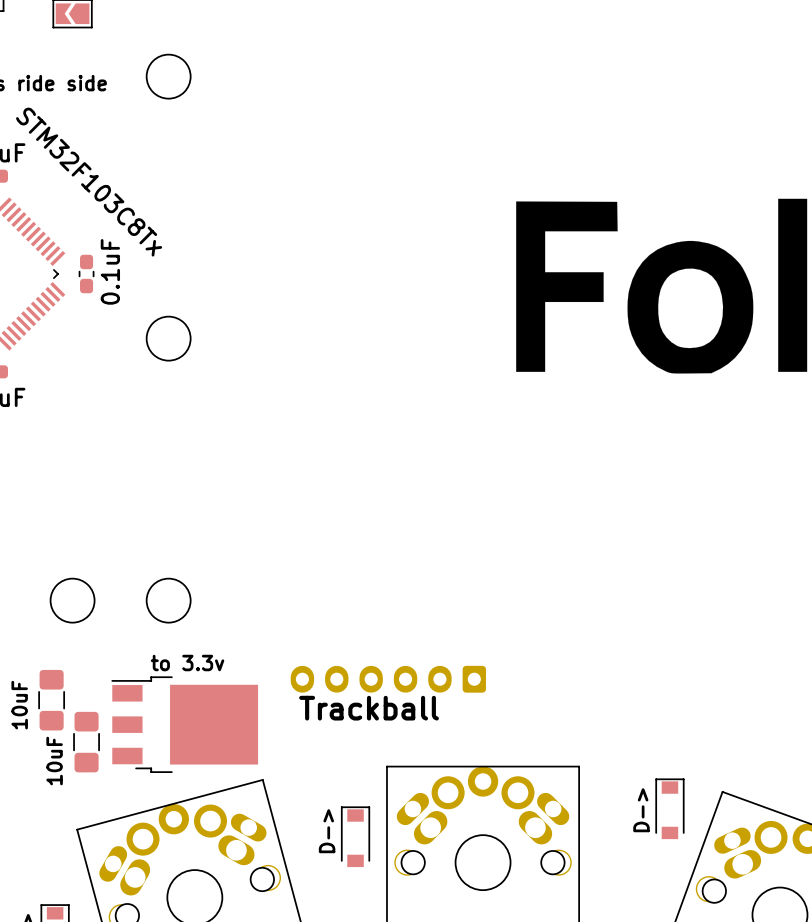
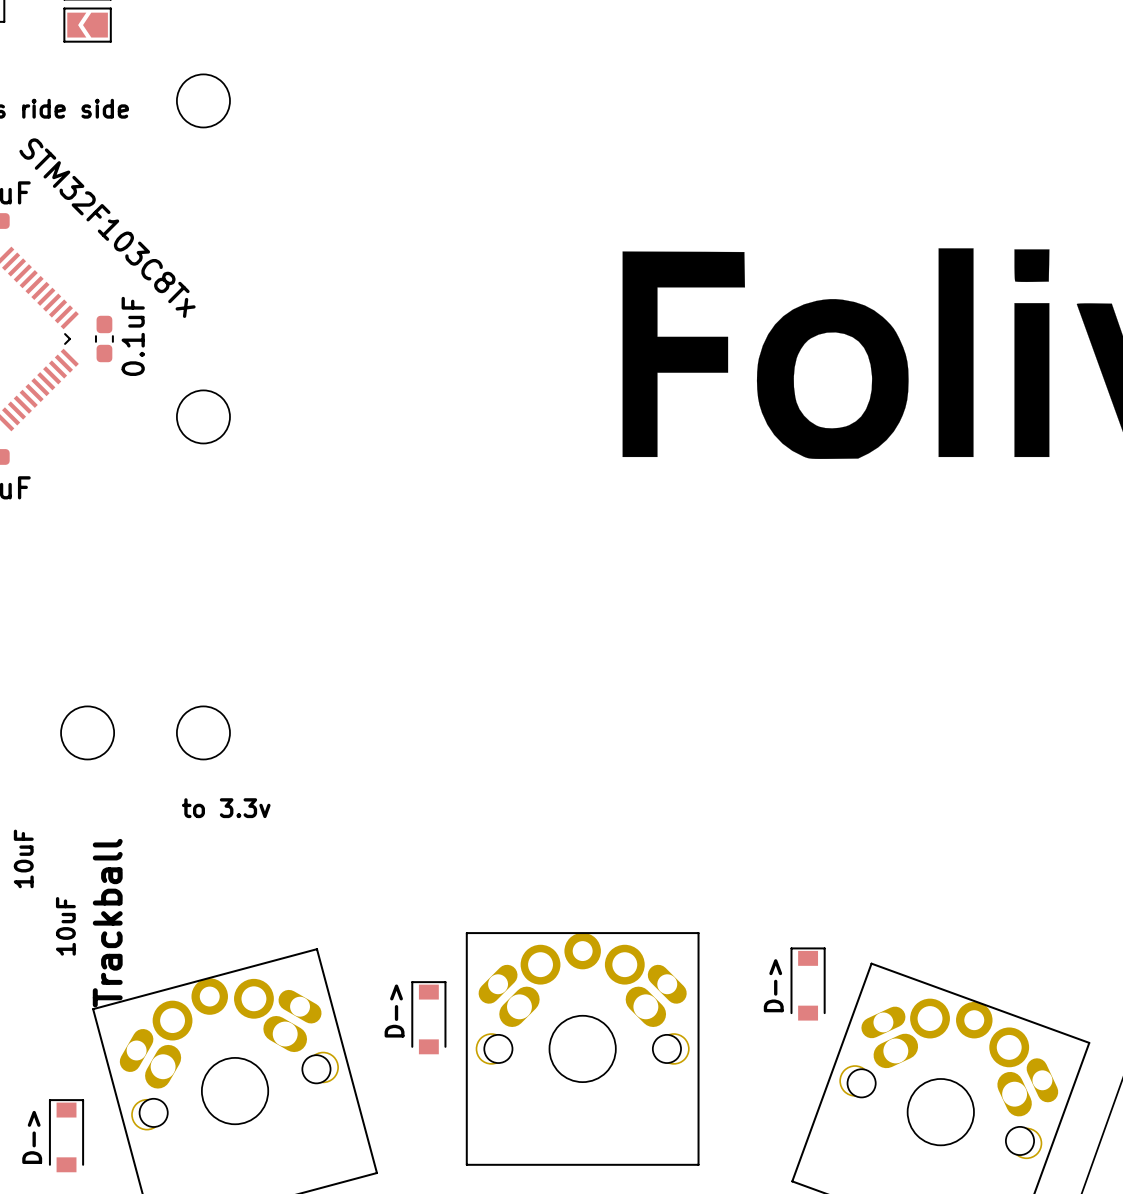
part: (388, 679) -> none
part: (51, 700) -> none
text rotation: 0° (369, 708) -> 90° counterclockwise (107, 923)
text position: Trackball (369, 708) -> Trackball (107, 923)
part: (184, 724) -> none
part: (86, 742) -> none

